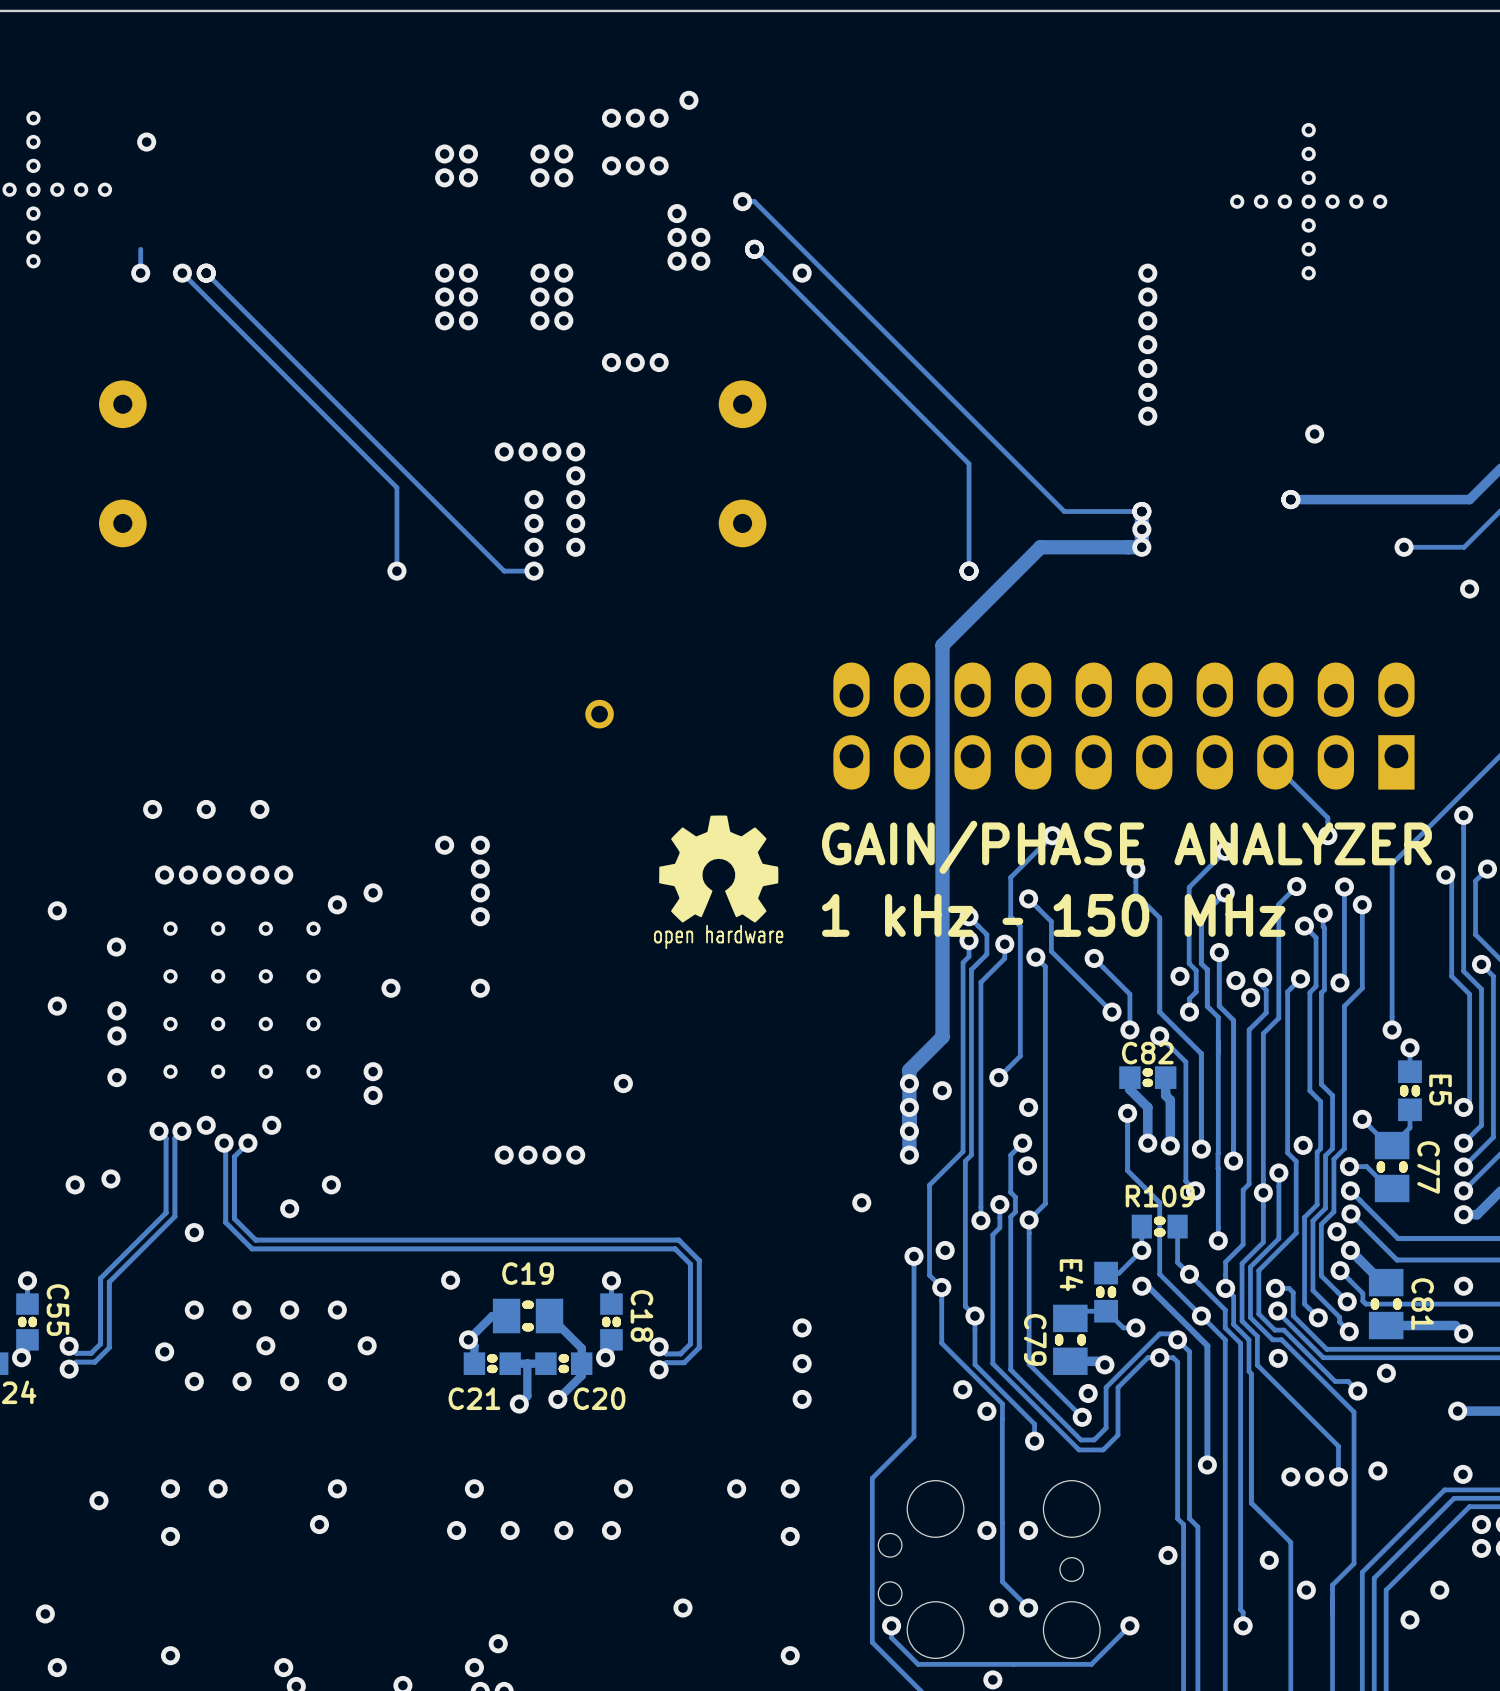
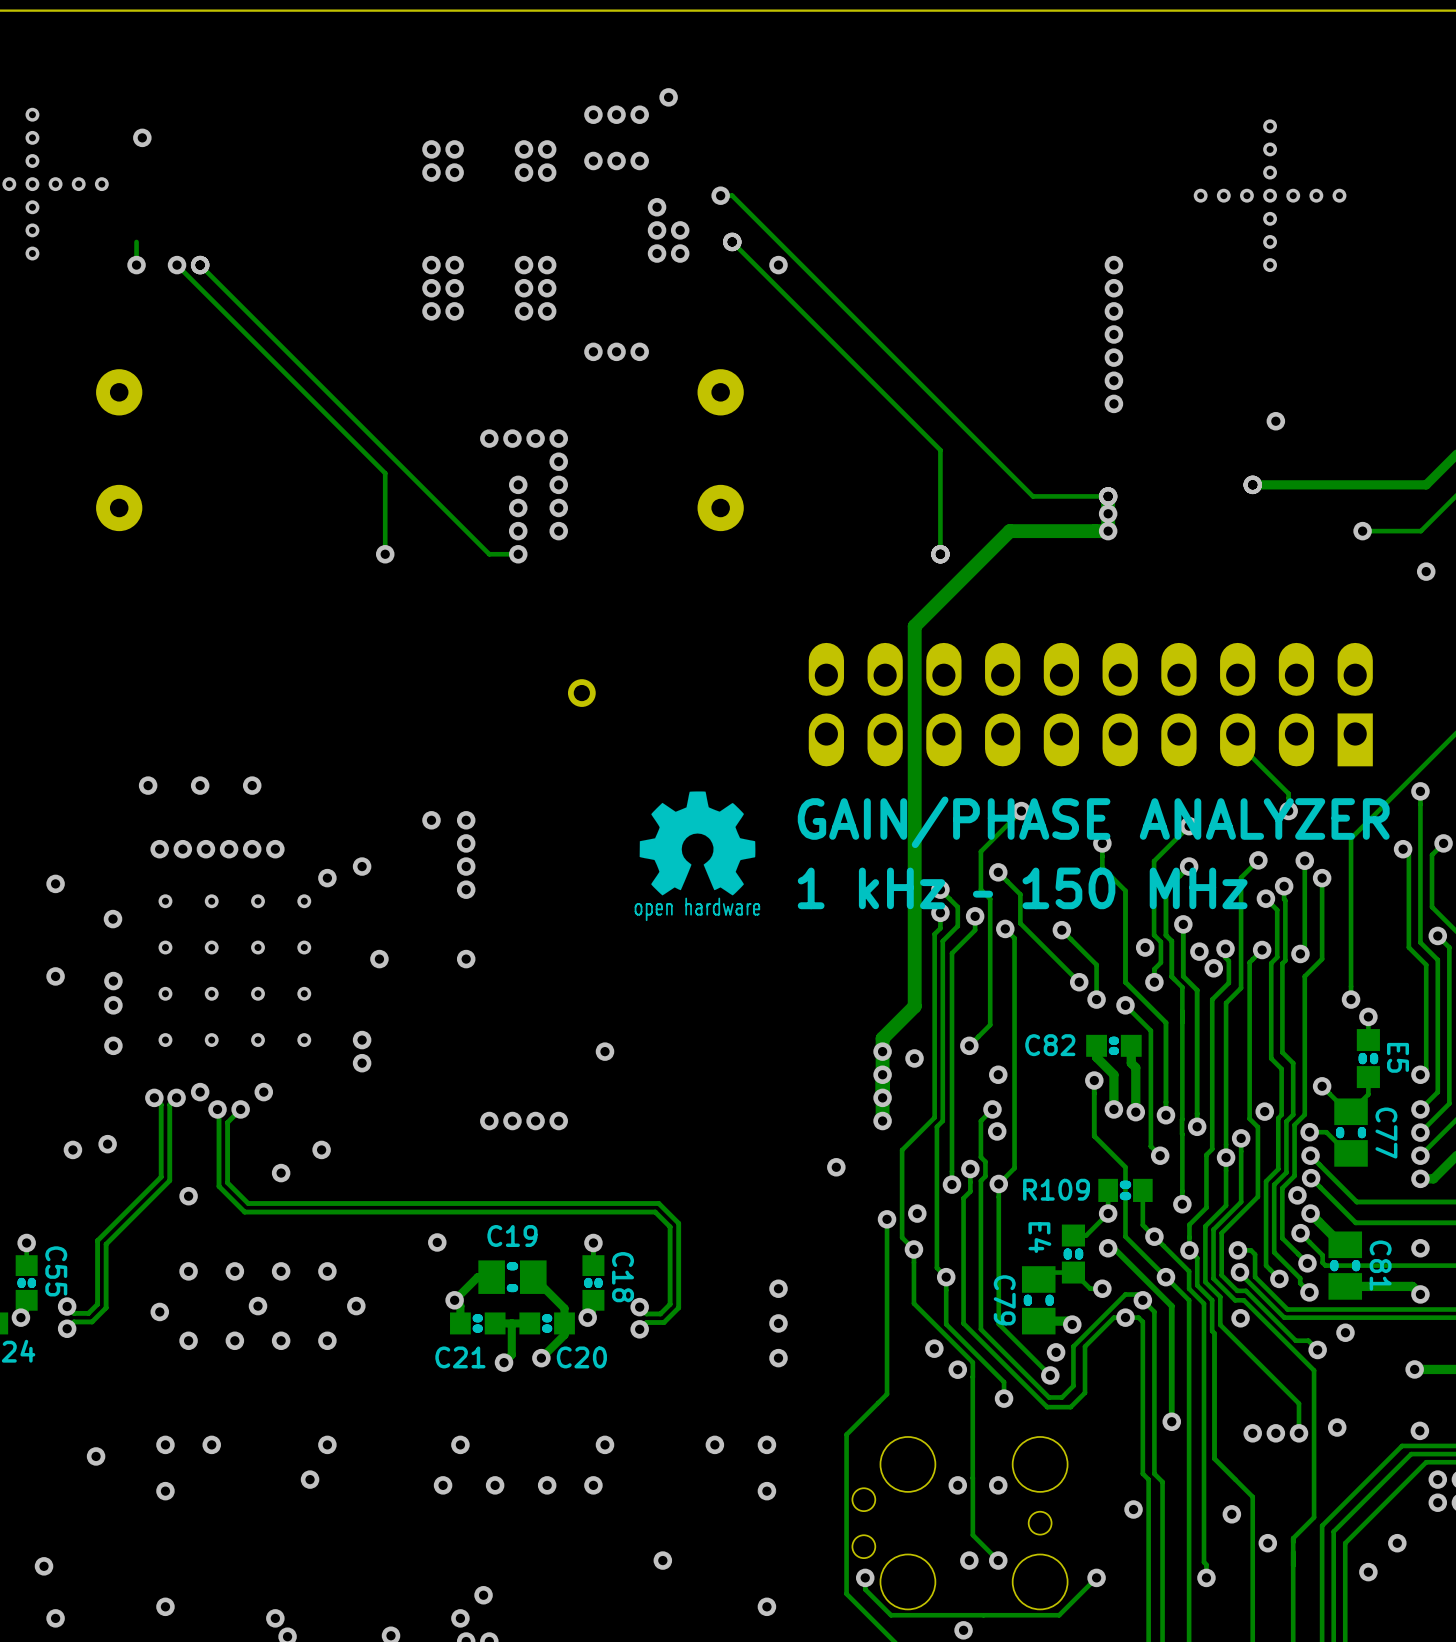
C82 name position: C82 (1147, 1053) -> C82 (1050, 1045)
R109 name position: R109 (1160, 1196) -> R109 (1056, 1189)

